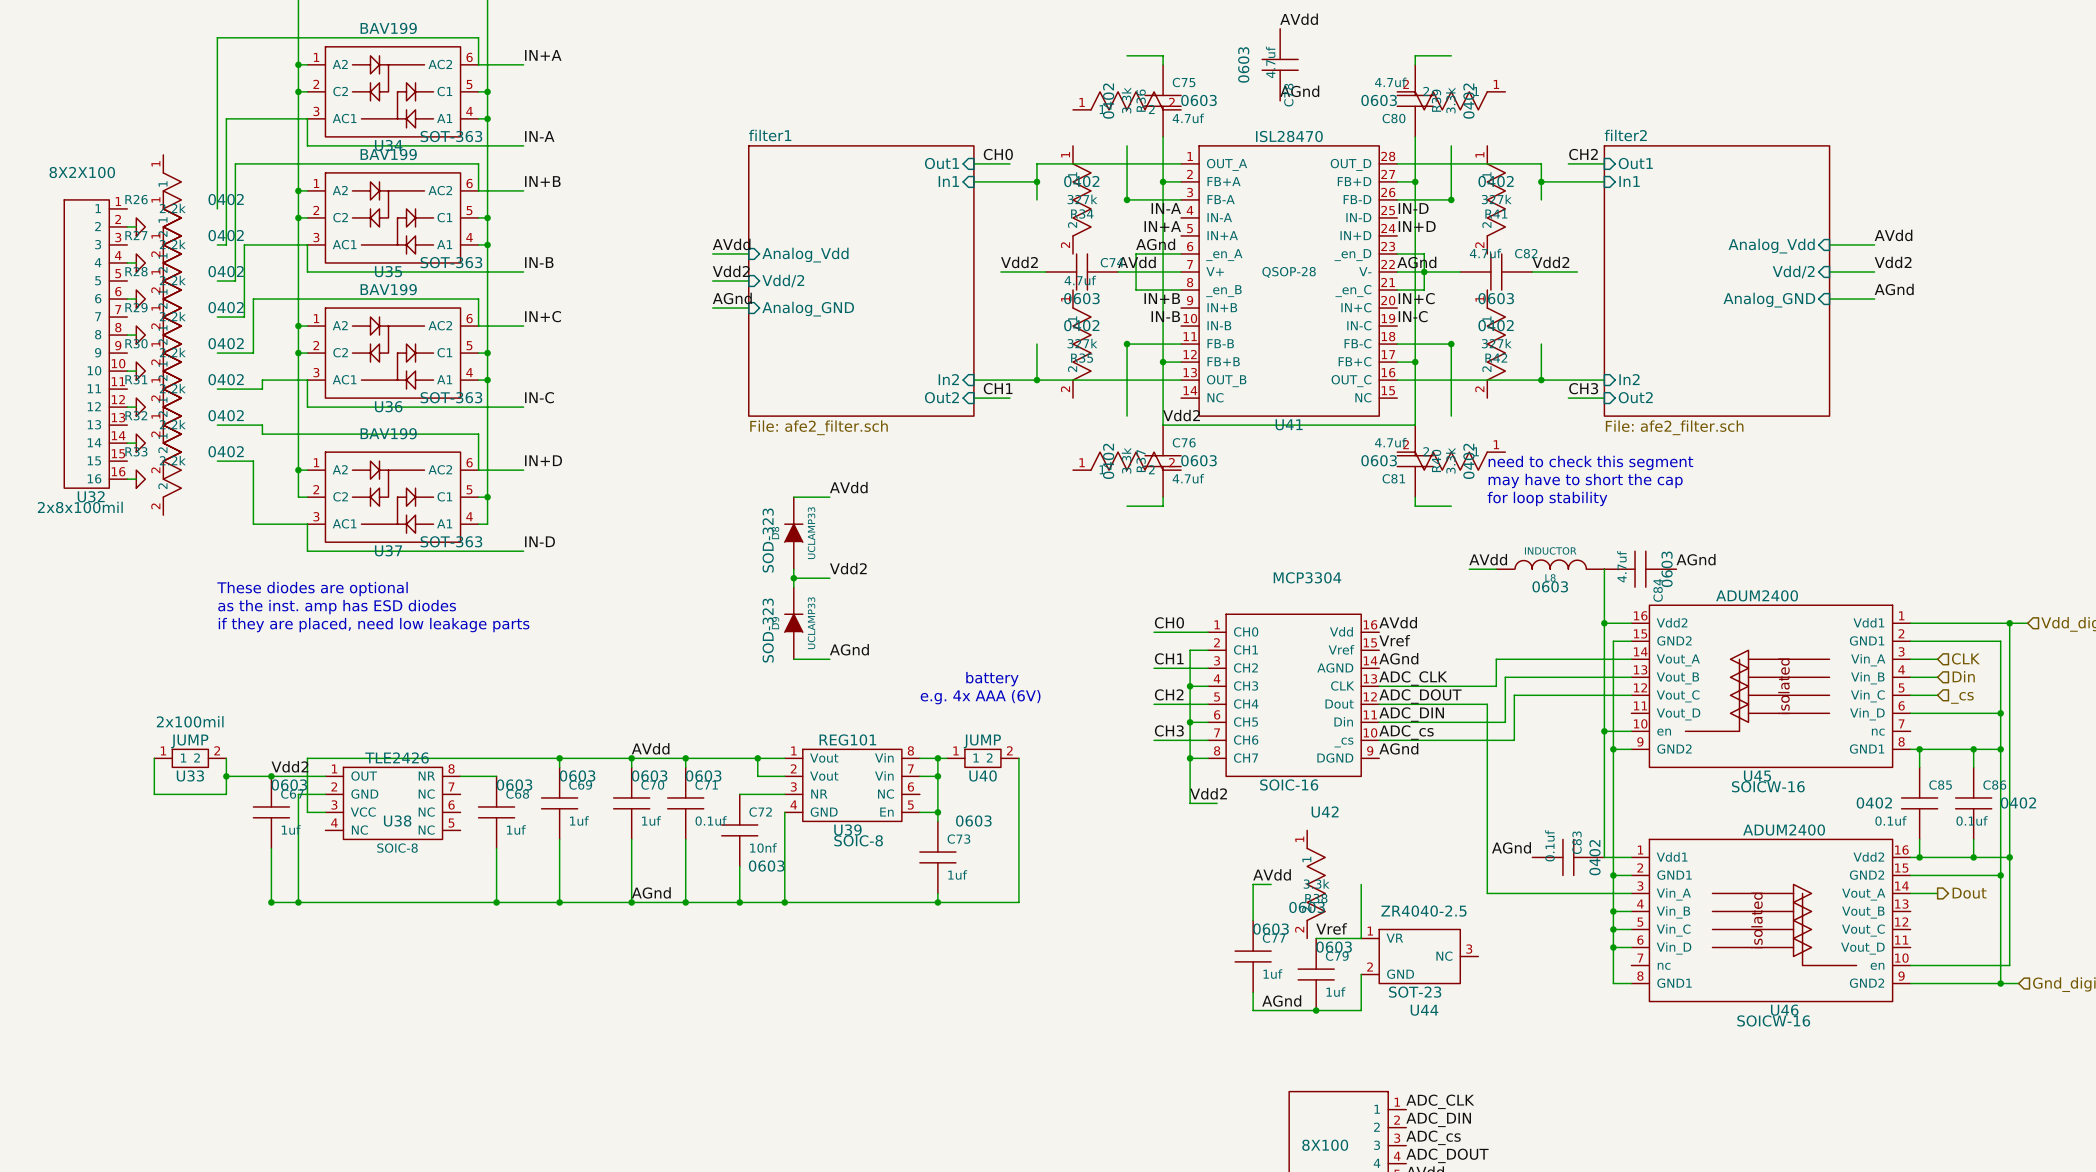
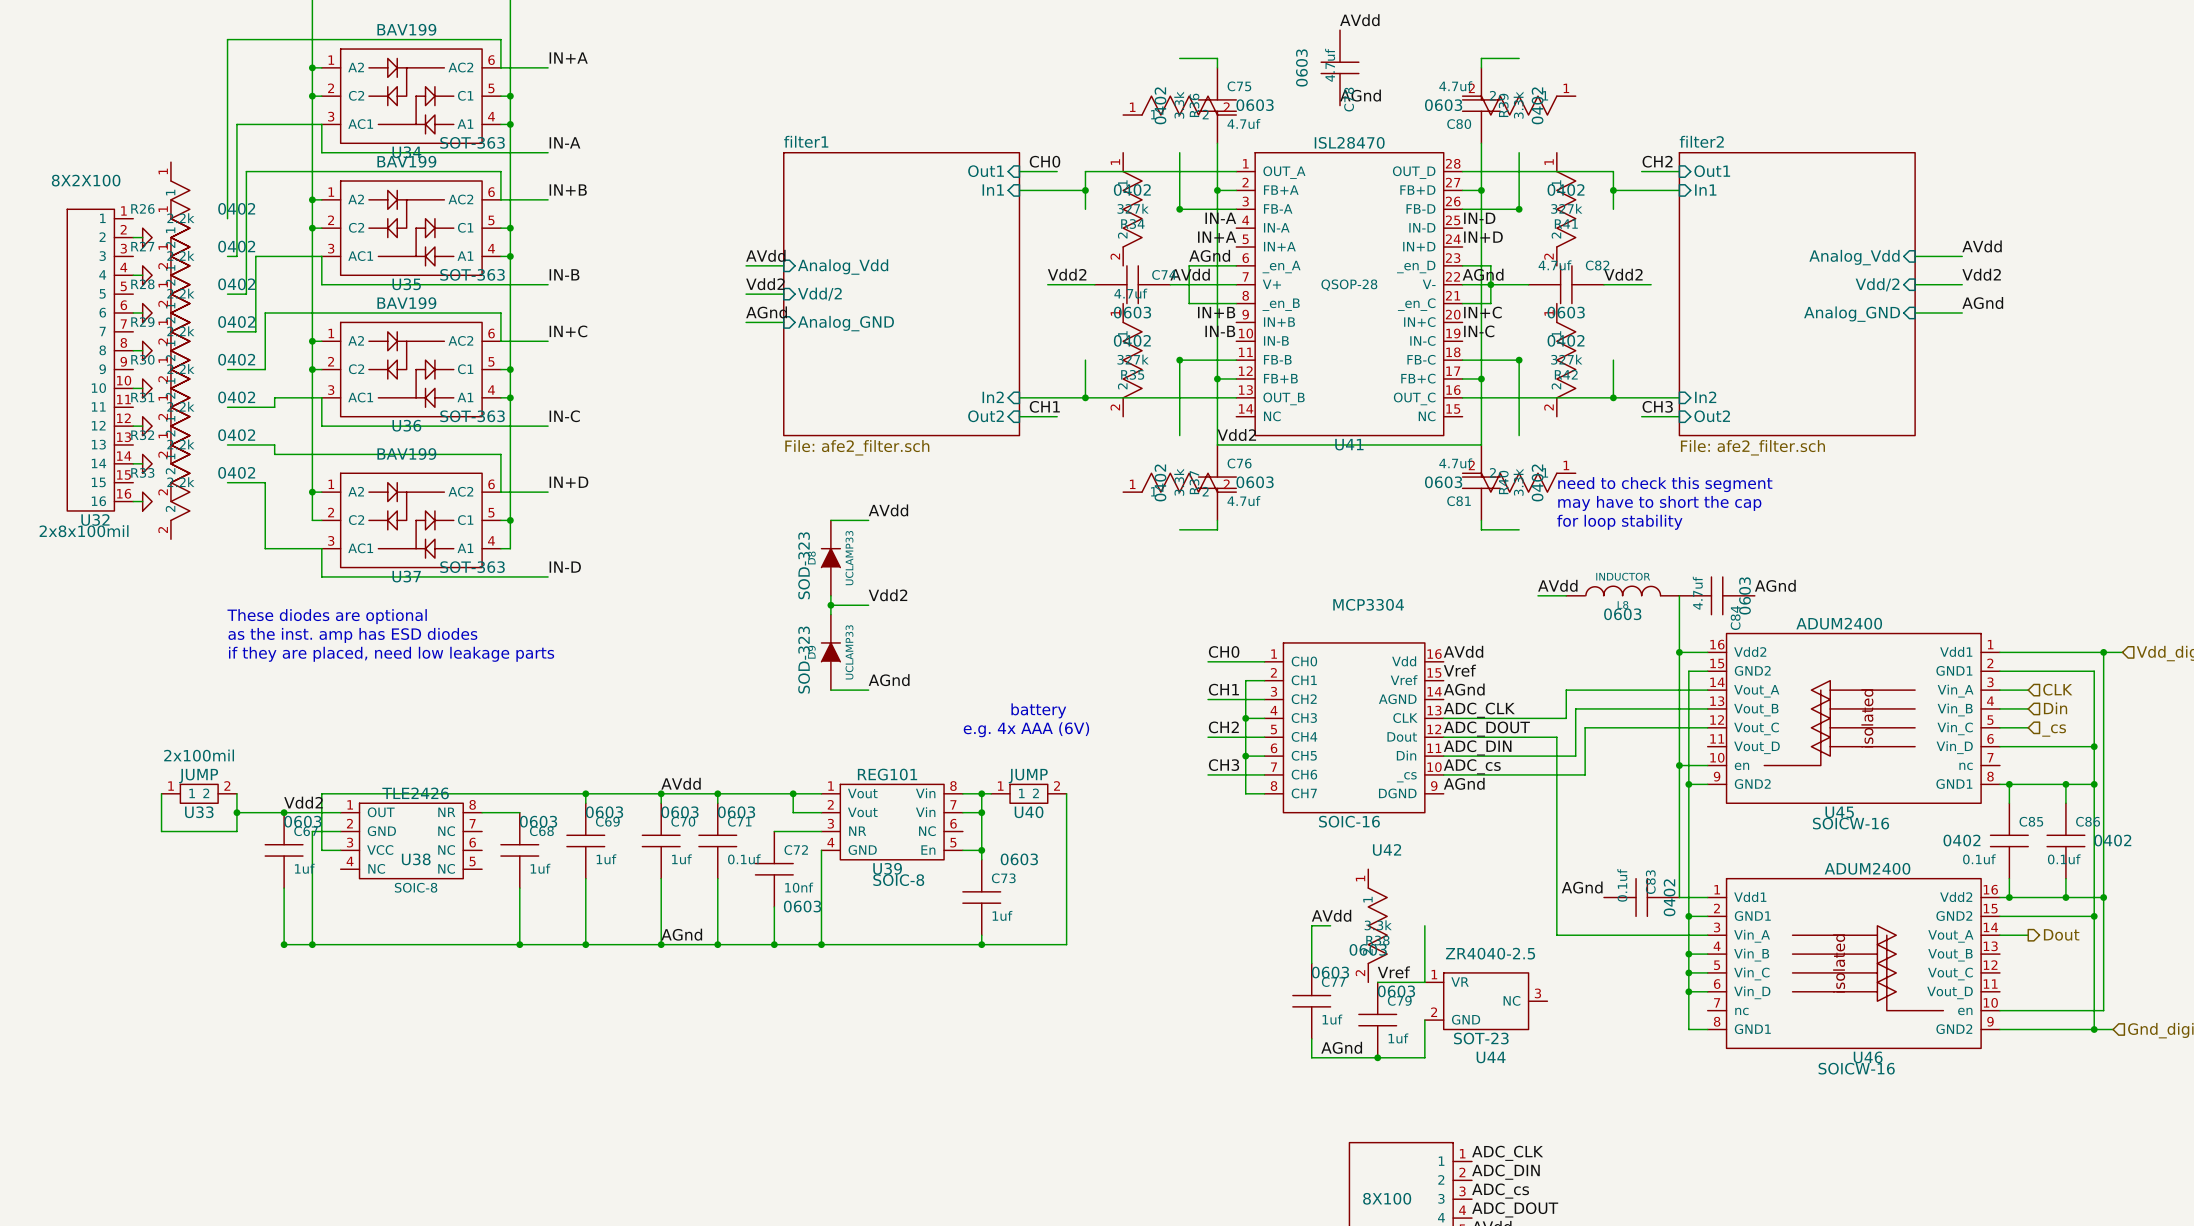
wire: (1190, 758) (1190, 803) (1217, 803) -> none
junction: (1190, 758) -> none
label: Vdd2 (1208, 793) -> none

